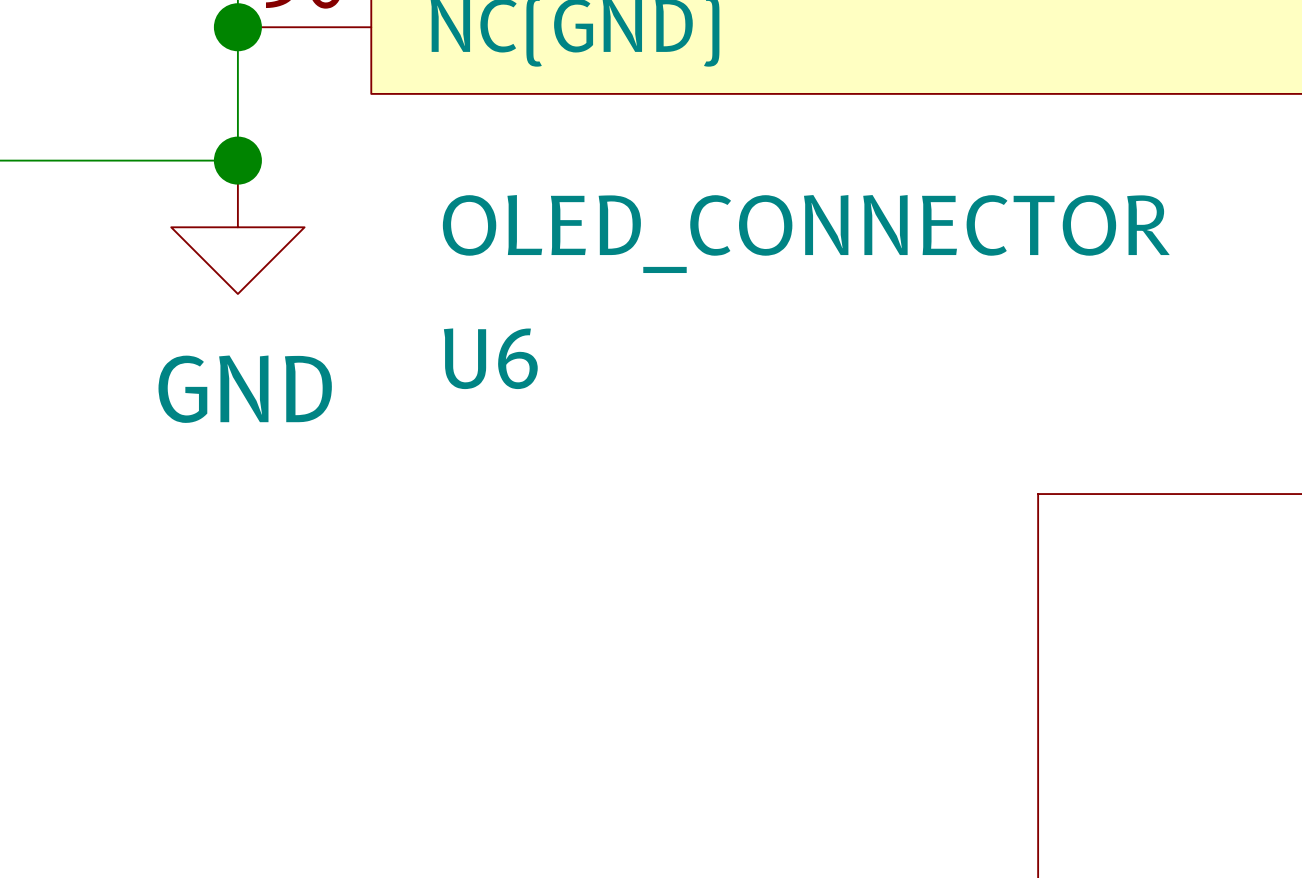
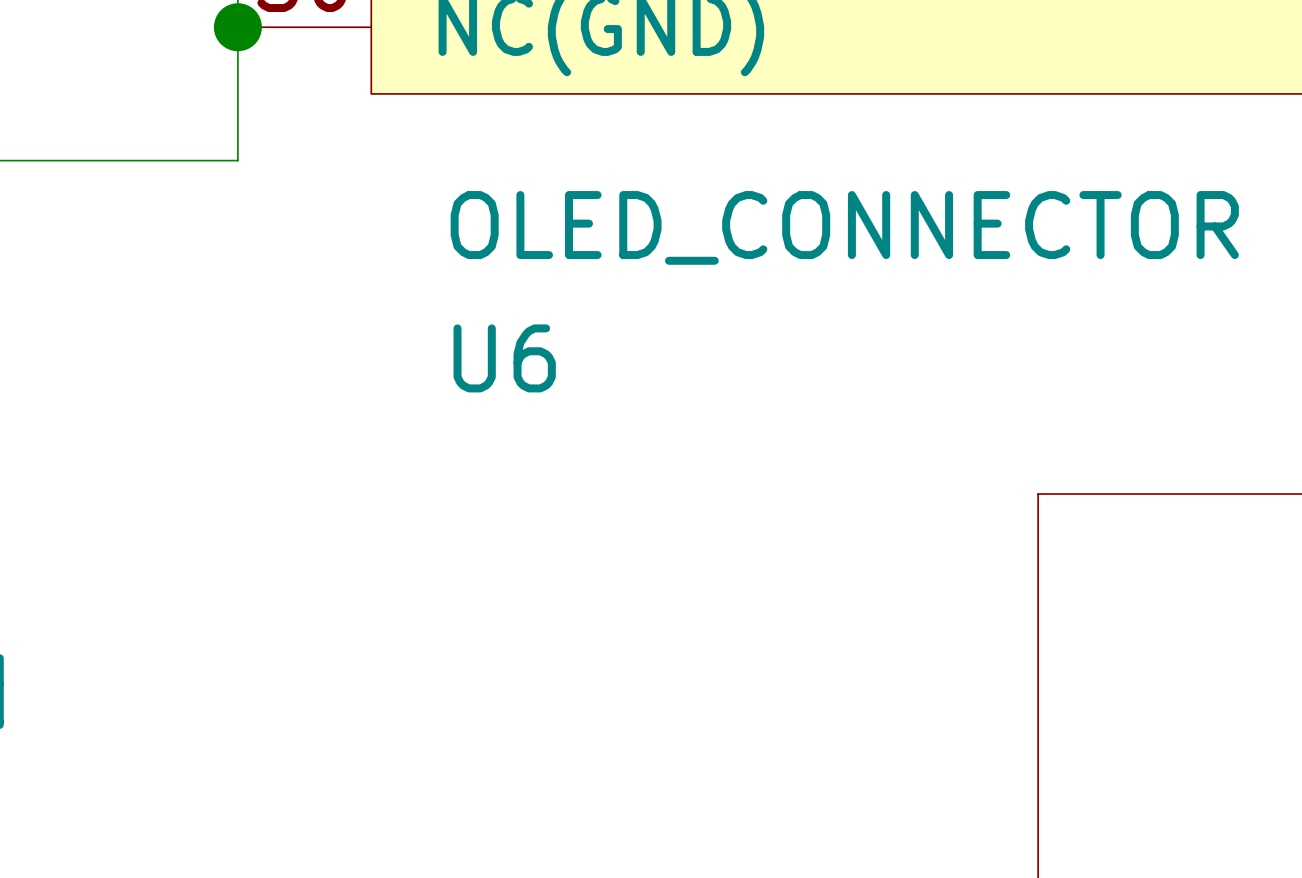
junction: (237, 160) -> none
power symbol: GND (237, 227) -> none

